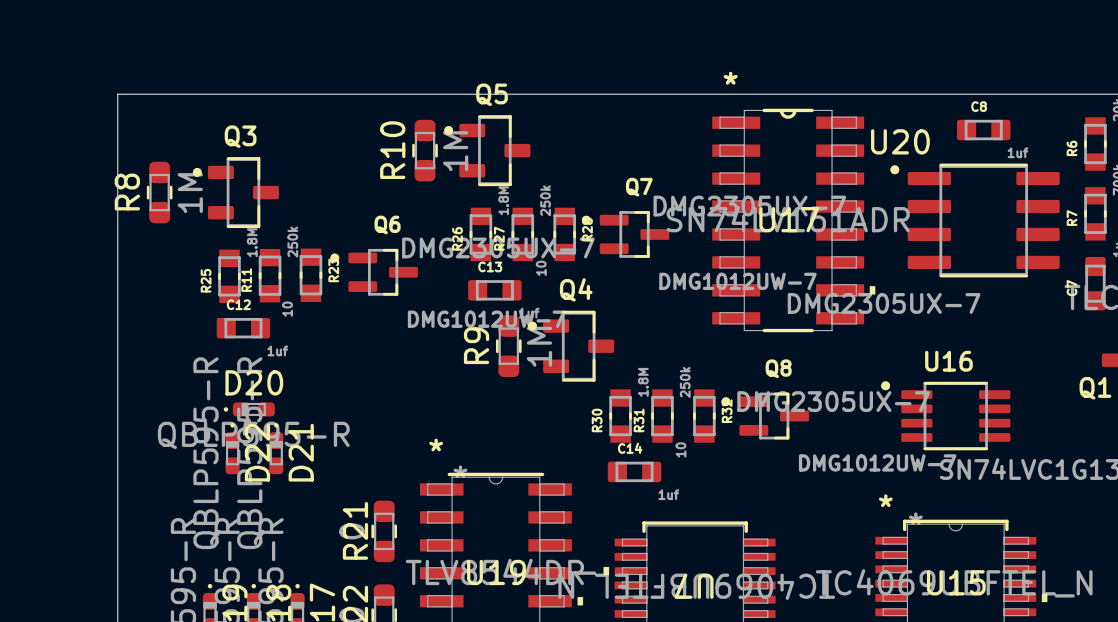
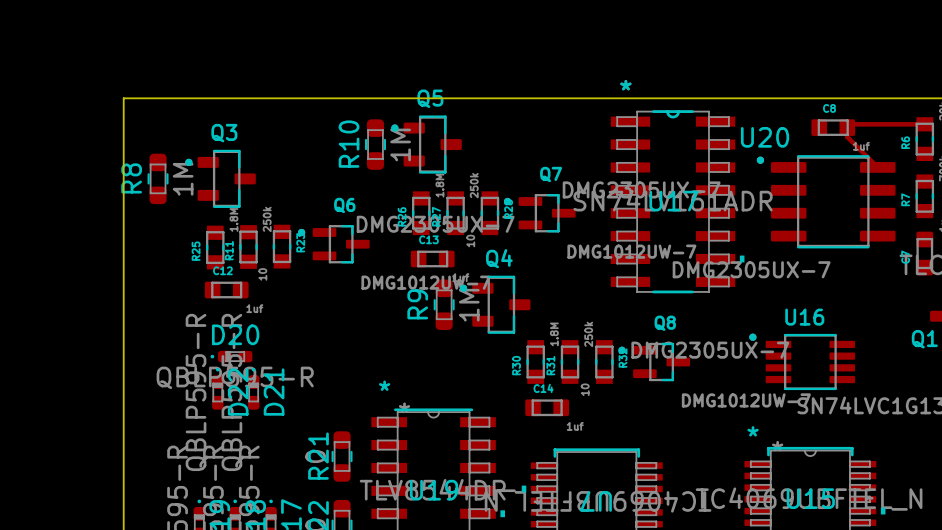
top track: none -> (924, 124) (850, 124) (847, 127) (847, 136) (877, 167)

